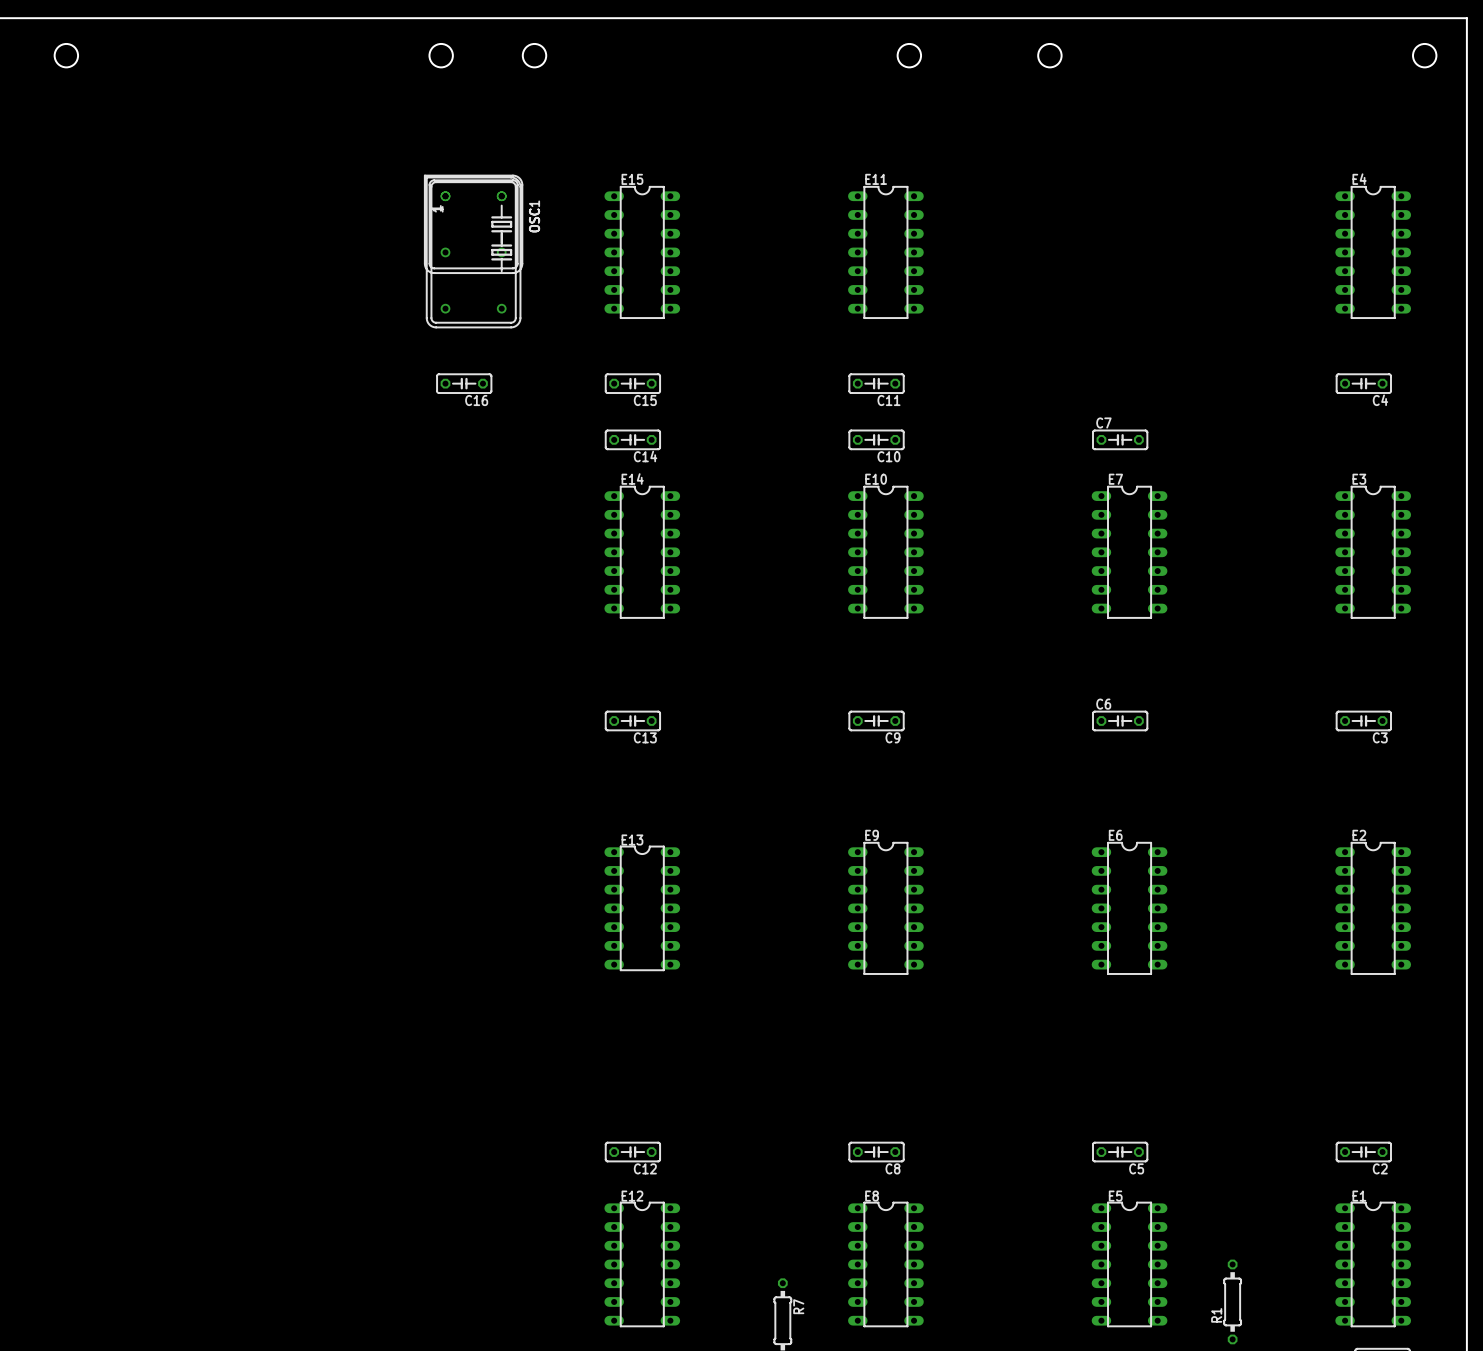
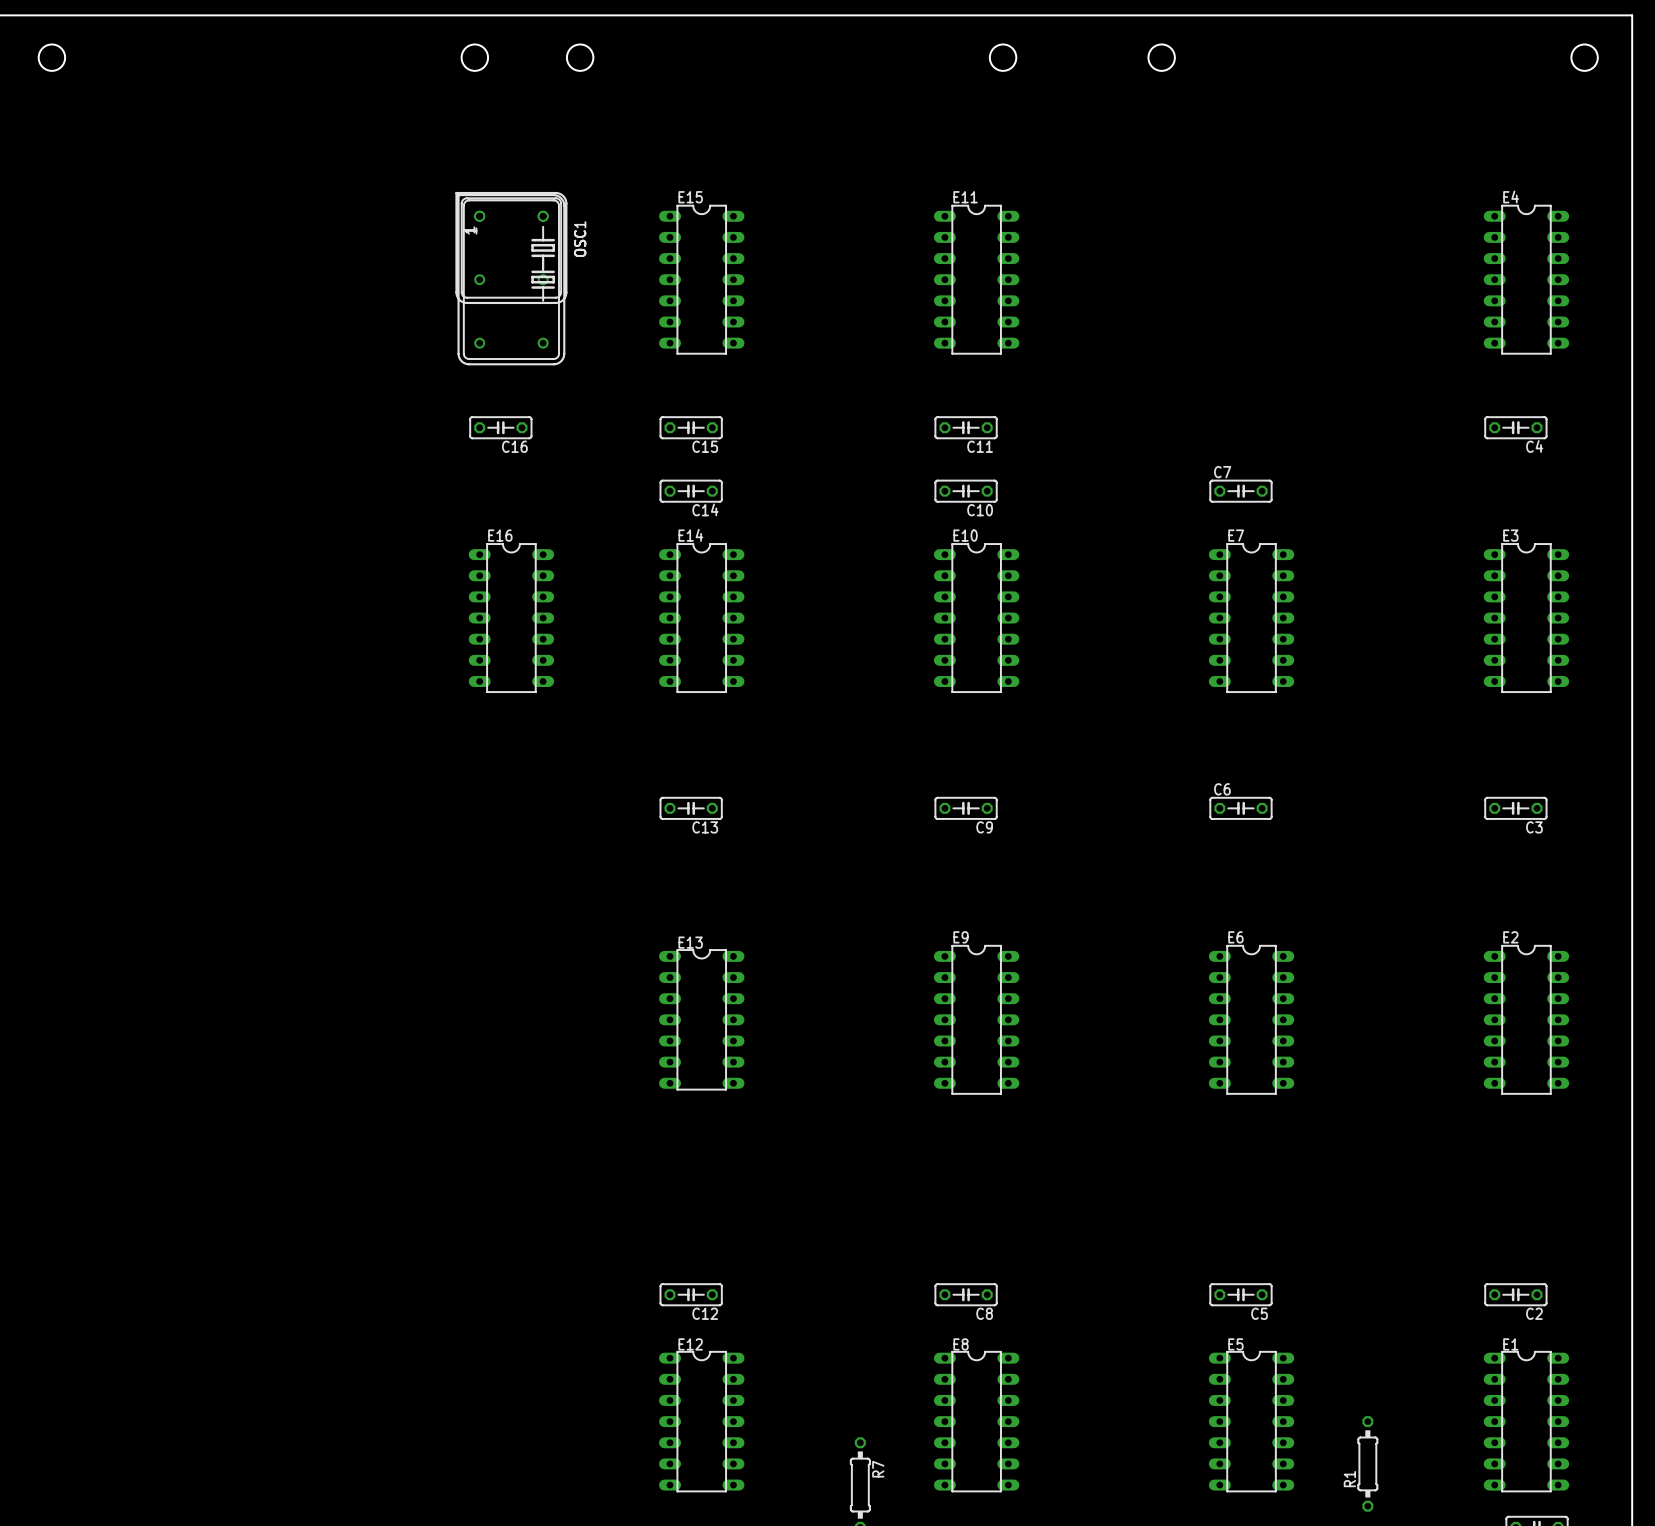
E16: none -> (511, 618)

